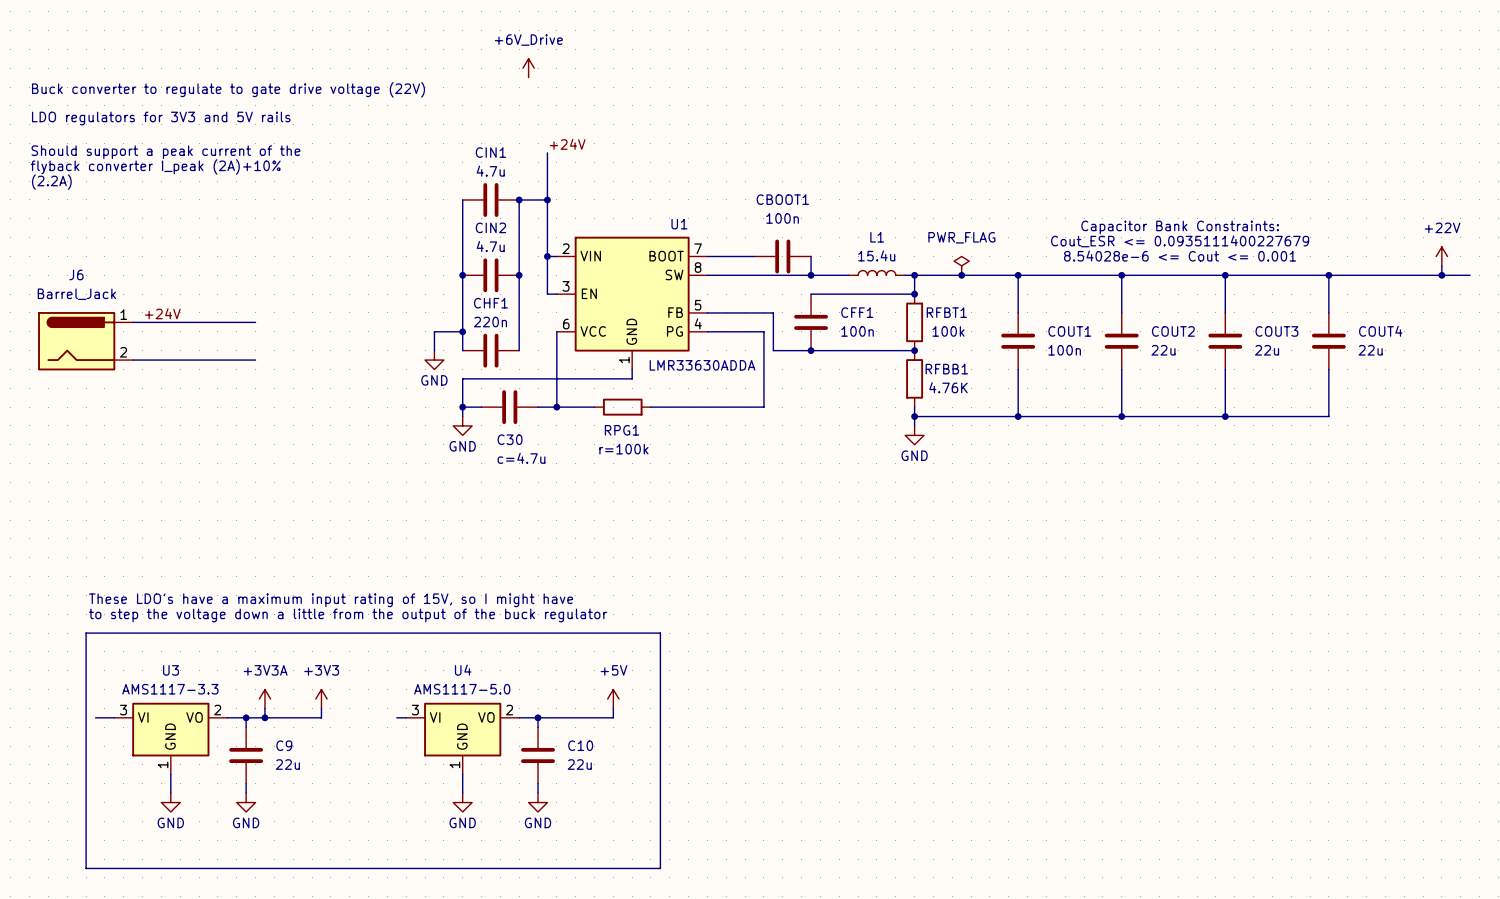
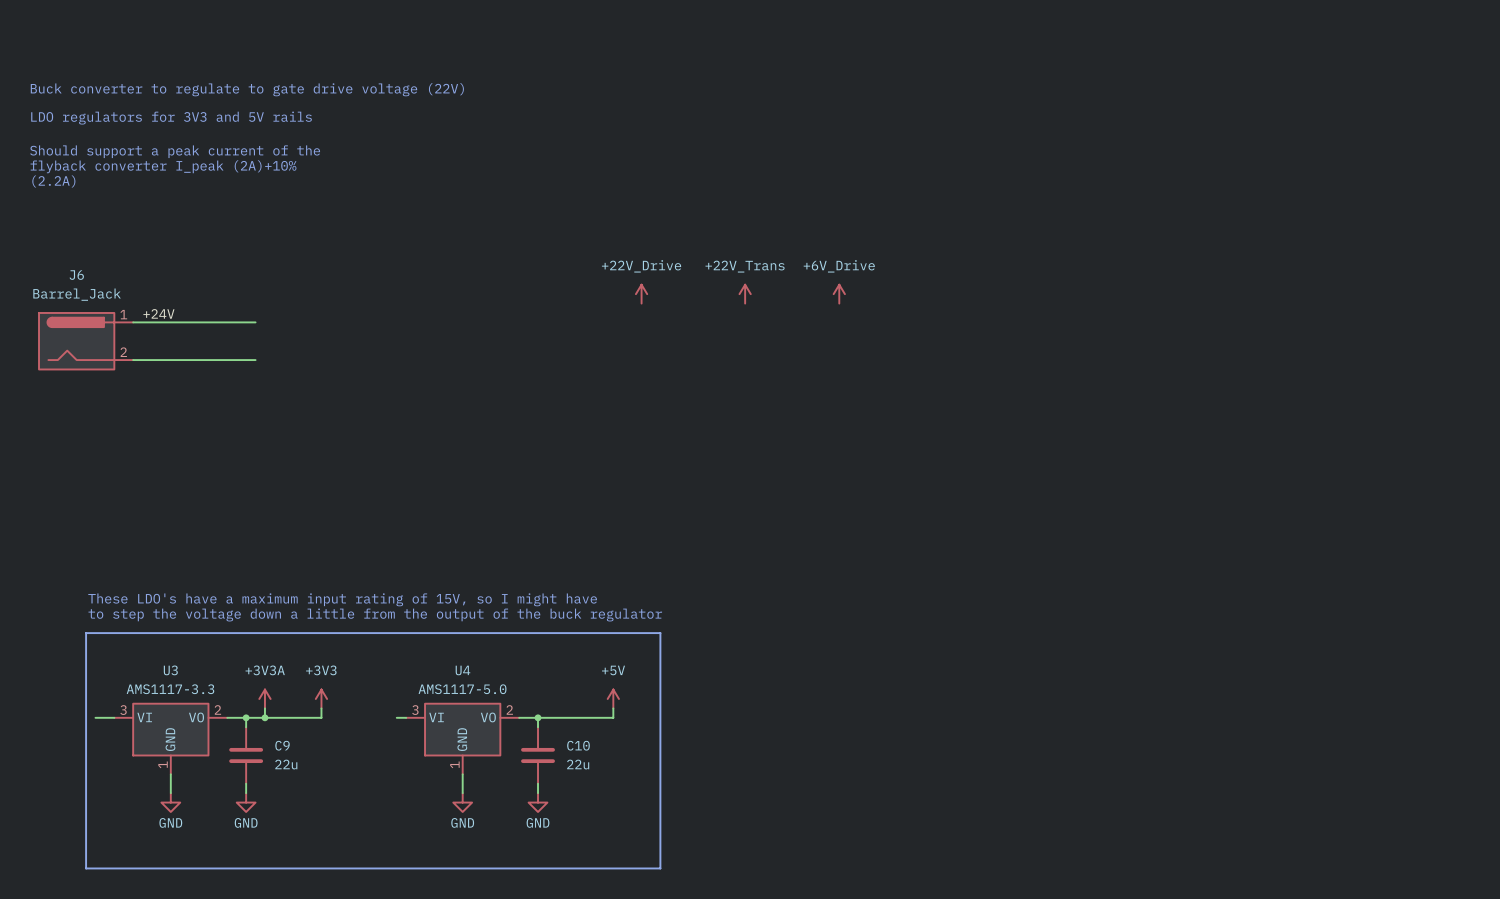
power symbol: +6V_Drive (528, 68) -> none
label: +24V (567, 144) -> none
wire: (547, 152) (547, 294) (556, 294) -> none
wire: (462, 199) (462, 350) -> none
CIN1: 4.7u (490, 199) -> none
junction: (519, 199) -> none
wire: (547, 199) (519, 199) (519, 350) -> none
junction: (547, 199) -> none
text: Capacitor Bank Constraints: (1180, 227) -> none
text: Cout_ESR <= 0.0935111400227679 (1180, 241) -> none
wire: (547, 256) (556, 256) -> none
junction: (547, 256) -> none
wire: (707, 256) (754, 256) -> none
CBOOT1: 100n (782, 256) -> none
wire: (811, 256) (811, 275) -> none
text: 8.54028e-6 <= Cout <= 0.001 (1180, 256) -> none
power symbol: +22V (1441, 256) -> none
power symbol: PWR_FLAG (961, 265) -> none
wire: (1441, 265) (1441, 275) -> none
L1: 15.4u (876, 272) -> none
junction: (462, 275) -> none
CIN2: 4.7u (490, 275) -> none
junction: (519, 275) -> none
wire: (707, 275) (848, 275) -> none
junction: (811, 275) -> none
wire: (905, 275) (1470, 275) -> none
wire: (914, 275) (914, 294) (811, 294) -> none
junction: (914, 275) -> none
junction: (961, 275) -> none
wire: (1018, 275) (1018, 312) -> none
junction: (1018, 275) -> none
wire: (1121, 275) (1121, 312) -> none
junction: (1121, 275) -> none
wire: (1225, 275) (1225, 312) -> none
junction: (1225, 275) -> none
wire: (1328, 275) (1328, 312) -> none
junction: (1328, 275) -> none
junction: (1441, 275) -> none
power symbol: none -> +22V_Drive (641, 294)
power symbol: none -> +22V_Trans (745, 294)
power symbol: none -> +6V_Drive (839, 294)
junction: (914, 294) -> none
U1: LMR33630ADDA (632, 303) -> none
wire: (707, 312) (773, 312) (773, 350) (914, 350) -> none
CFF1: 100n (811, 322) -> none
RFBT1: 100k (914, 322) -> none
wire: (462, 331) (434, 331) (434, 350) -> none
junction: (462, 331) -> none
wire: (556, 331) (556, 407) -> none
wire: (707, 331) (763, 331) (763, 407) (650, 407) -> none
COUT1: 100n (1018, 341) -> none
COUT2: 22u (1121, 341) -> none
COUT3: 22u (1225, 341) -> none
COUT4: 22u (1328, 341) -> none
CHF1: 220n (490, 350) -> none
junction: (811, 350) -> none
junction: (914, 350) -> none
power symbol: GND (434, 360) -> none
wire: (632, 369) (632, 378) (462, 378) (462, 416) -> none
wire: (1018, 369) (1018, 416) -> none
wire: (1121, 369) (1121, 416) -> none
wire: (1225, 369) (1225, 416) -> none
wire: (1328, 369) (1328, 416) (914, 416) -> none
RFBB1: 4.76K (914, 378) -> none
wire: (462, 407) (481, 407) -> none
junction: (462, 407) -> none
C30: c=4.7u (509, 407) -> none
wire: (538, 407) (594, 407) -> none
junction: (556, 407) -> none
RPG1: r=100k (622, 407) -> none
wire: (914, 407) (914, 425) -> none
junction: (914, 416) -> none
junction: (1018, 416) -> none
junction: (1121, 416) -> none
junction: (1225, 416) -> none
power symbol: GND (462, 425) -> none
power symbol: GND (914, 435) -> none

